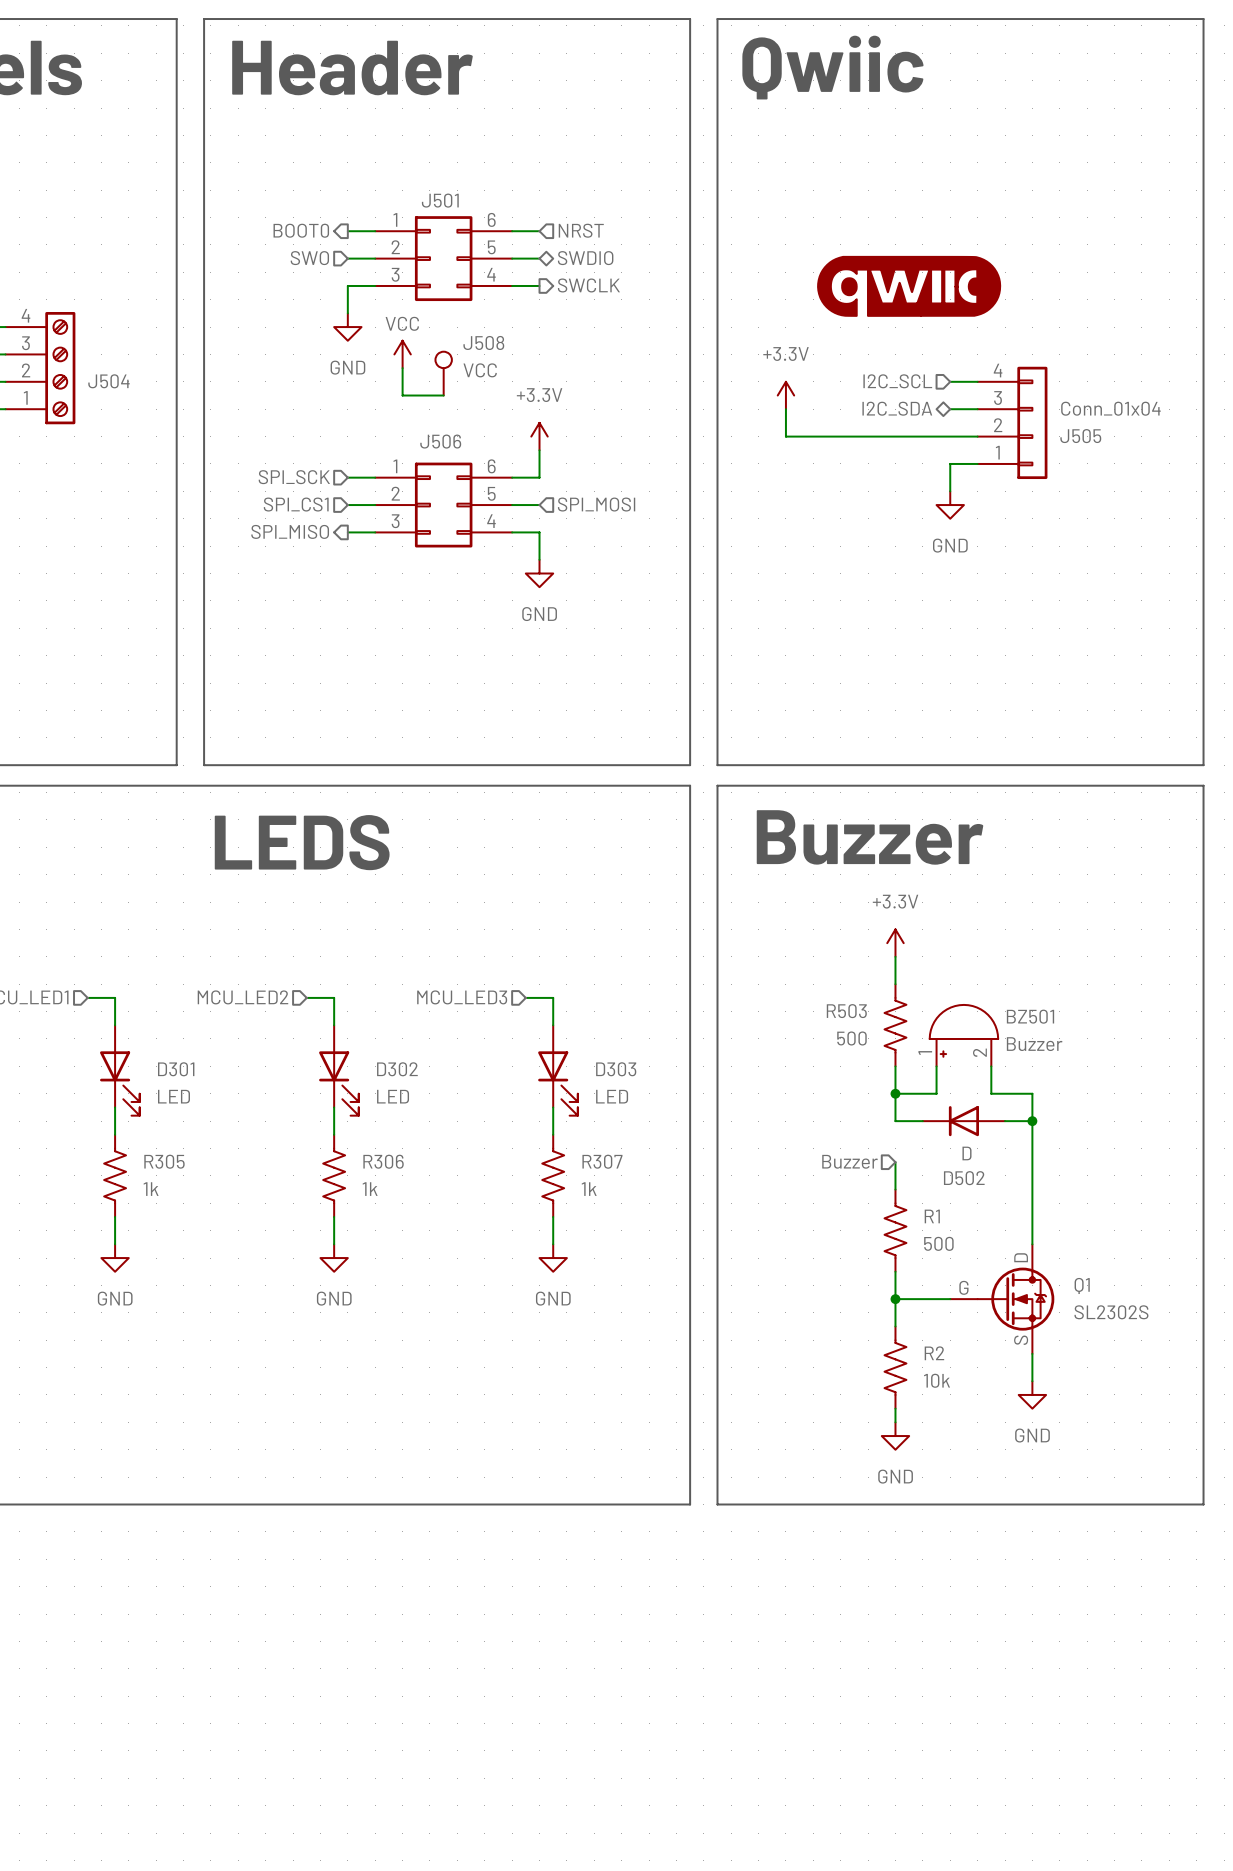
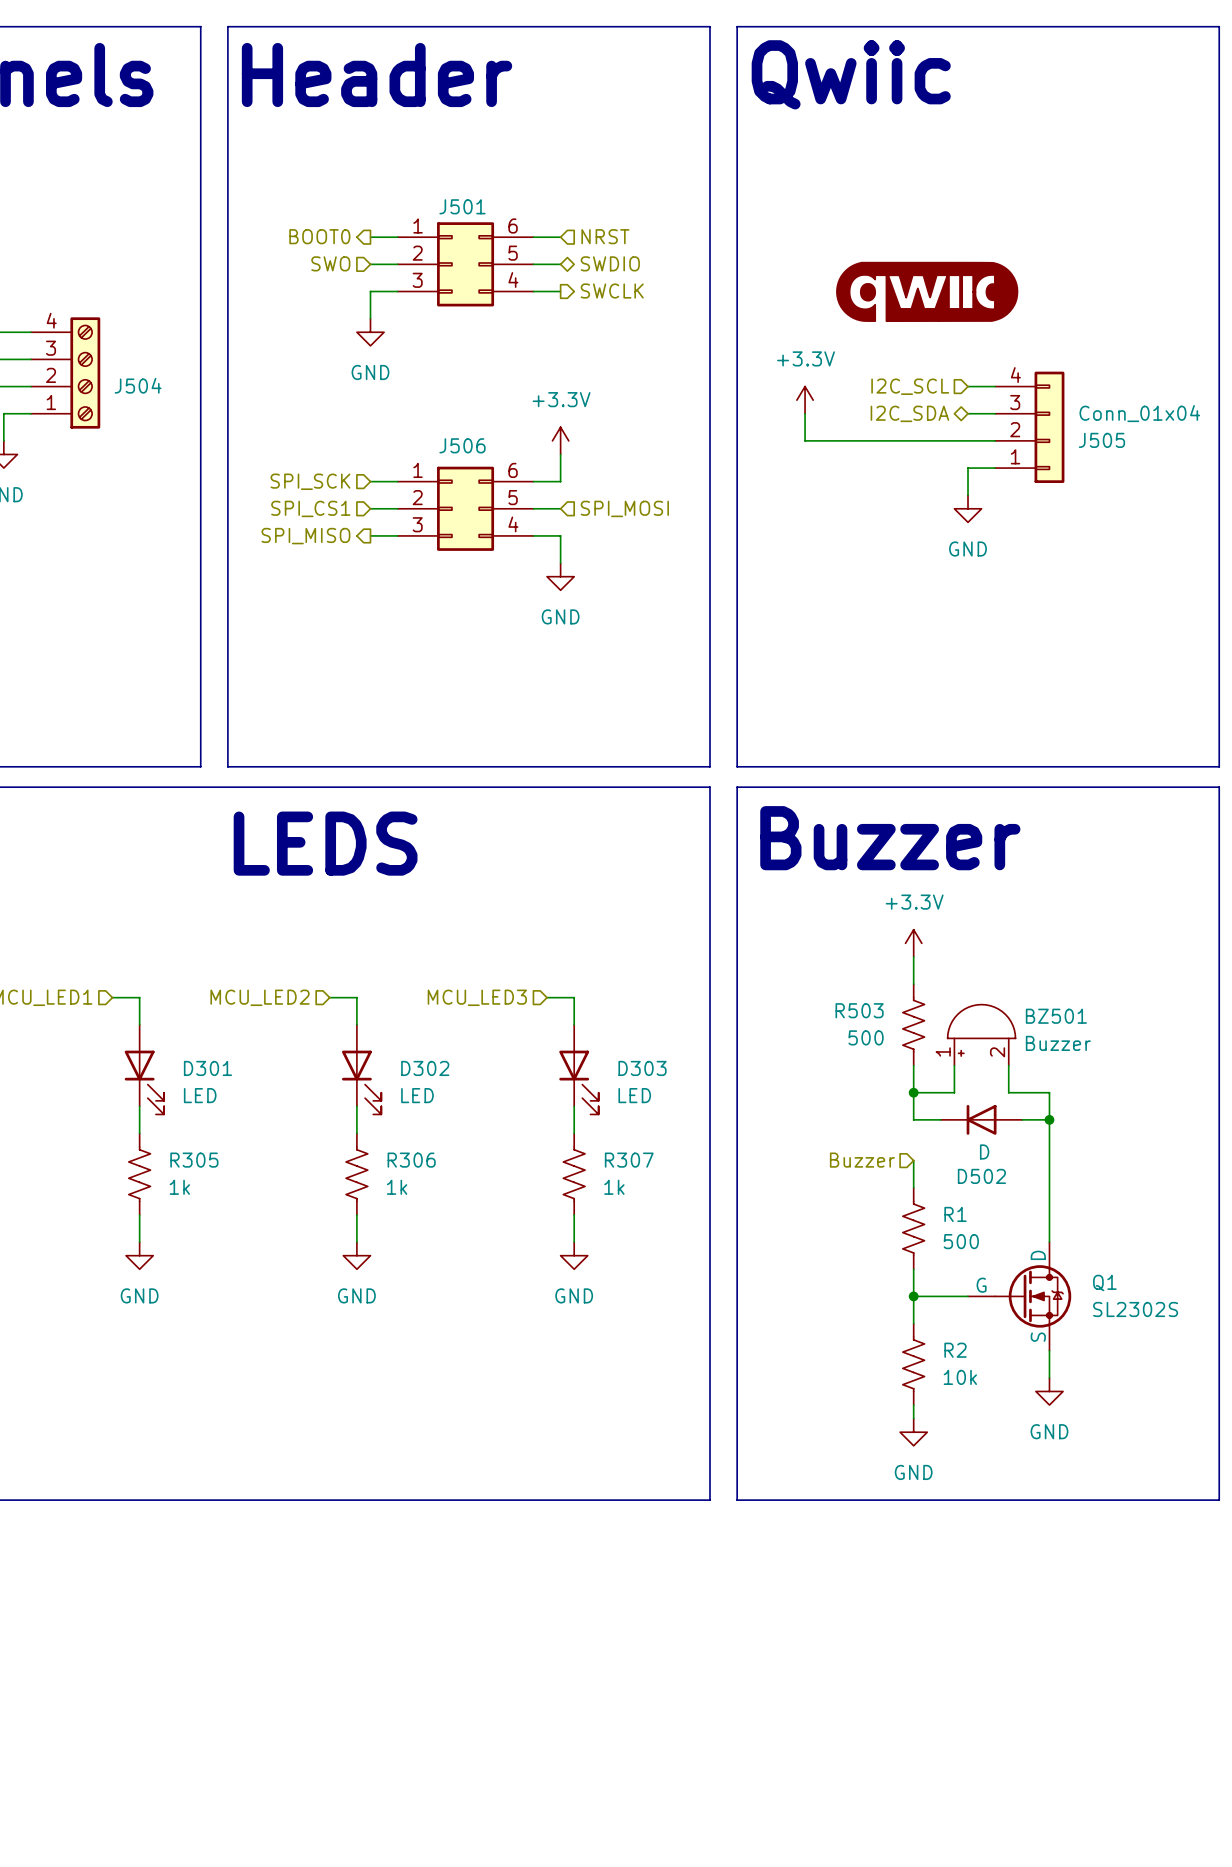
power symbol: VCC (402, 354) -> none
wire: (402, 368) (402, 395) (443, 395) -> none
J508: VCC (443, 373) -> none

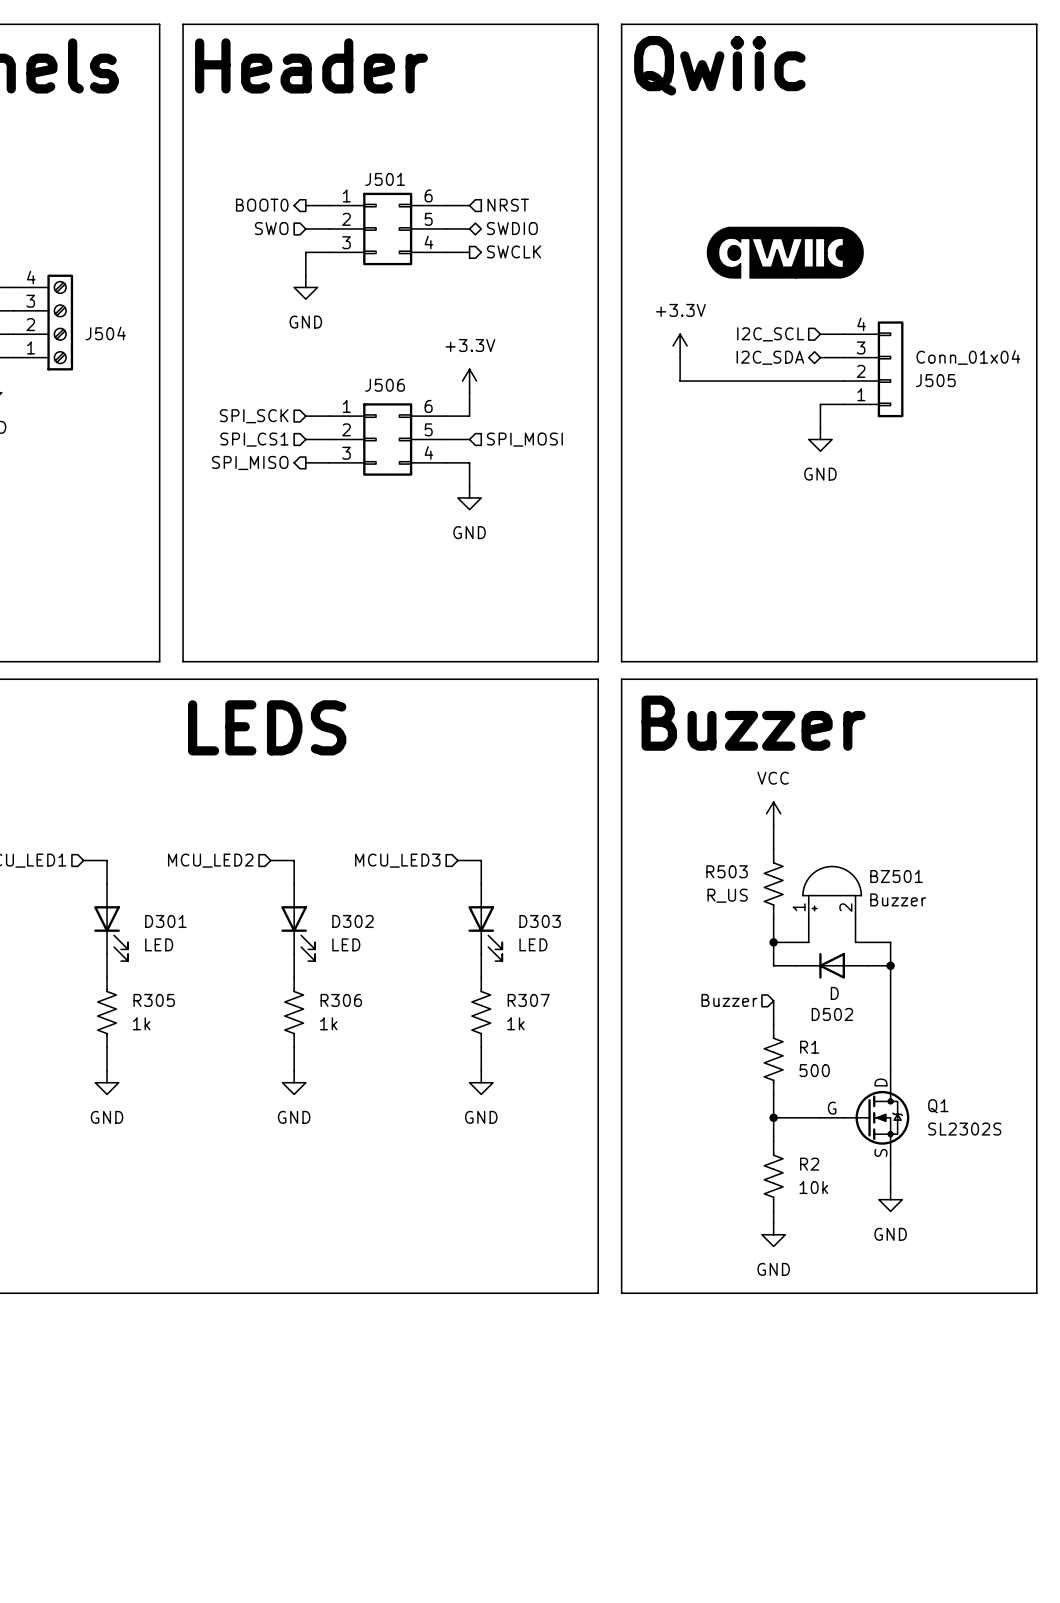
power symbol: +3.3V (913, 943) -> VCC (773, 813)
R503 value: 500 (866, 1037) -> R_US (727, 895)

